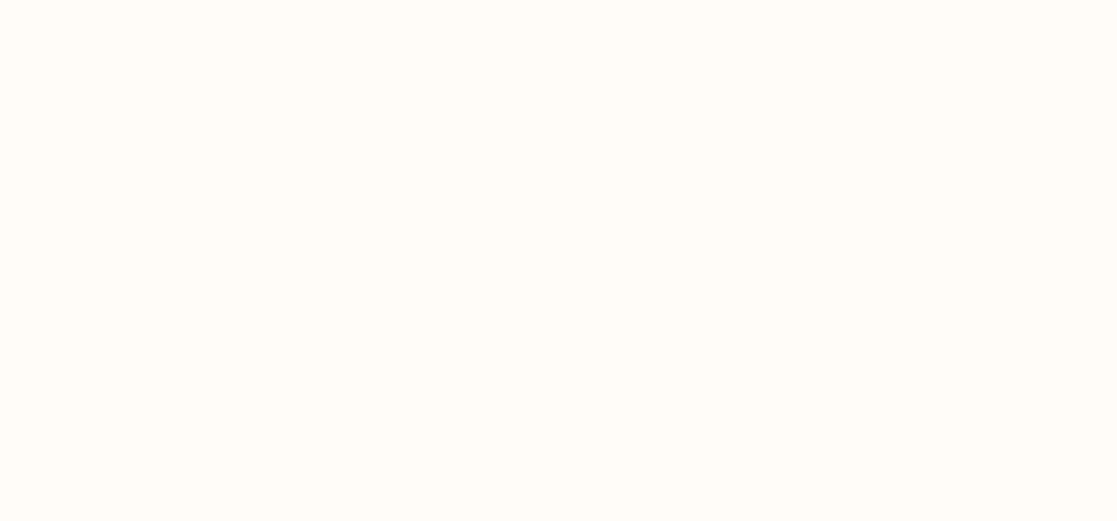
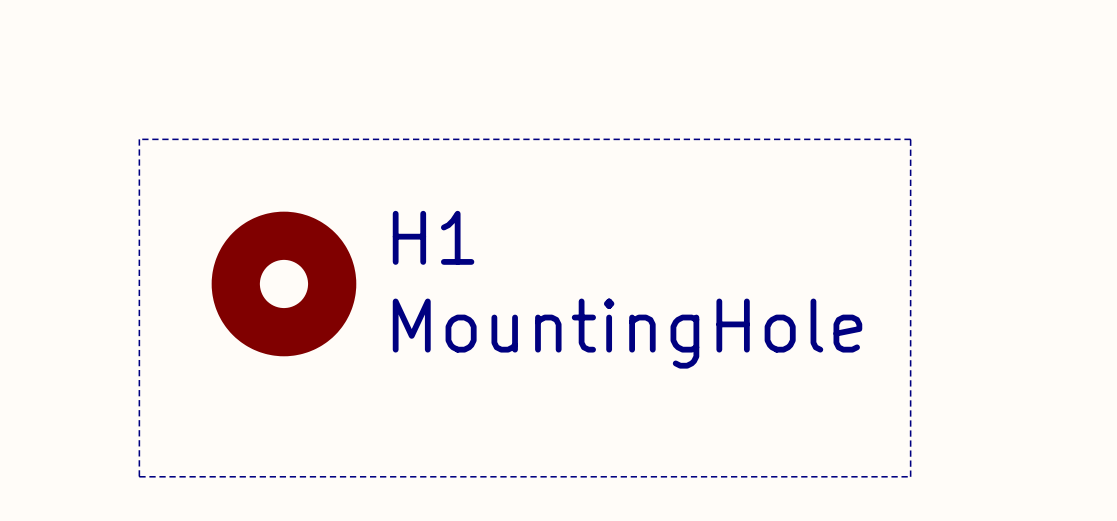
line: none -> (139, 139) (139, 476) (910, 476) (910, 139) (139, 139)
H1: none -> MountingHole (283, 283)

